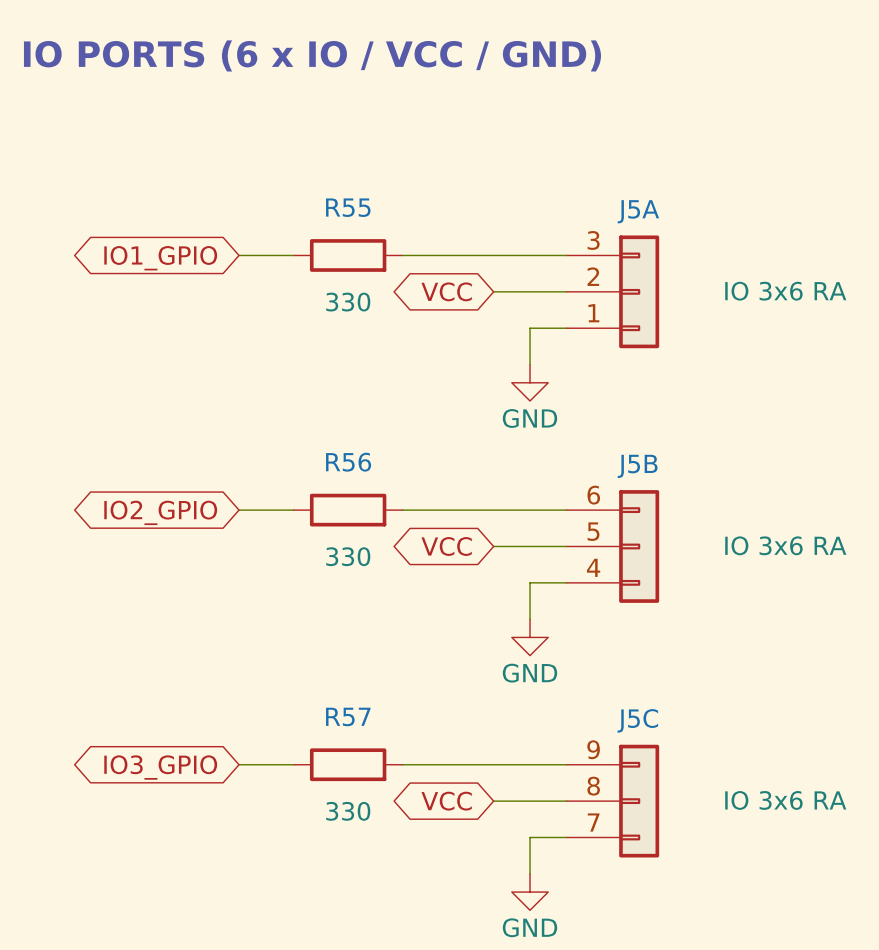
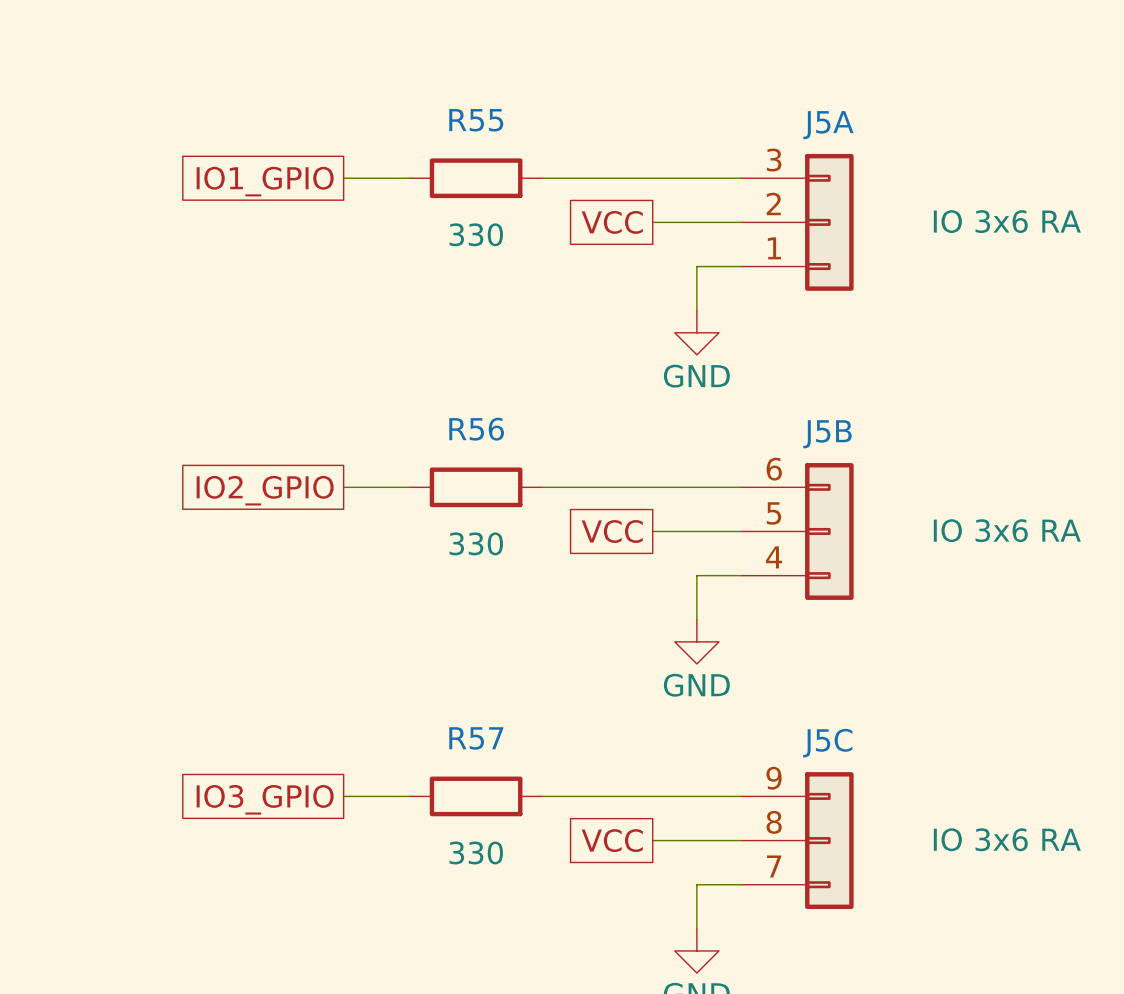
global label shape: bidirectional (160, 258) -> passive (265, 181)
global label shape: bidirectional (446, 291) -> passive (612, 222)
global label shape: bidirectional (160, 512) -> passive (265, 490)
global label shape: bidirectional (446, 546) -> passive (612, 531)
global label shape: bidirectional (160, 767) -> passive (265, 799)
global label shape: bidirectional (446, 801) -> passive (612, 840)

